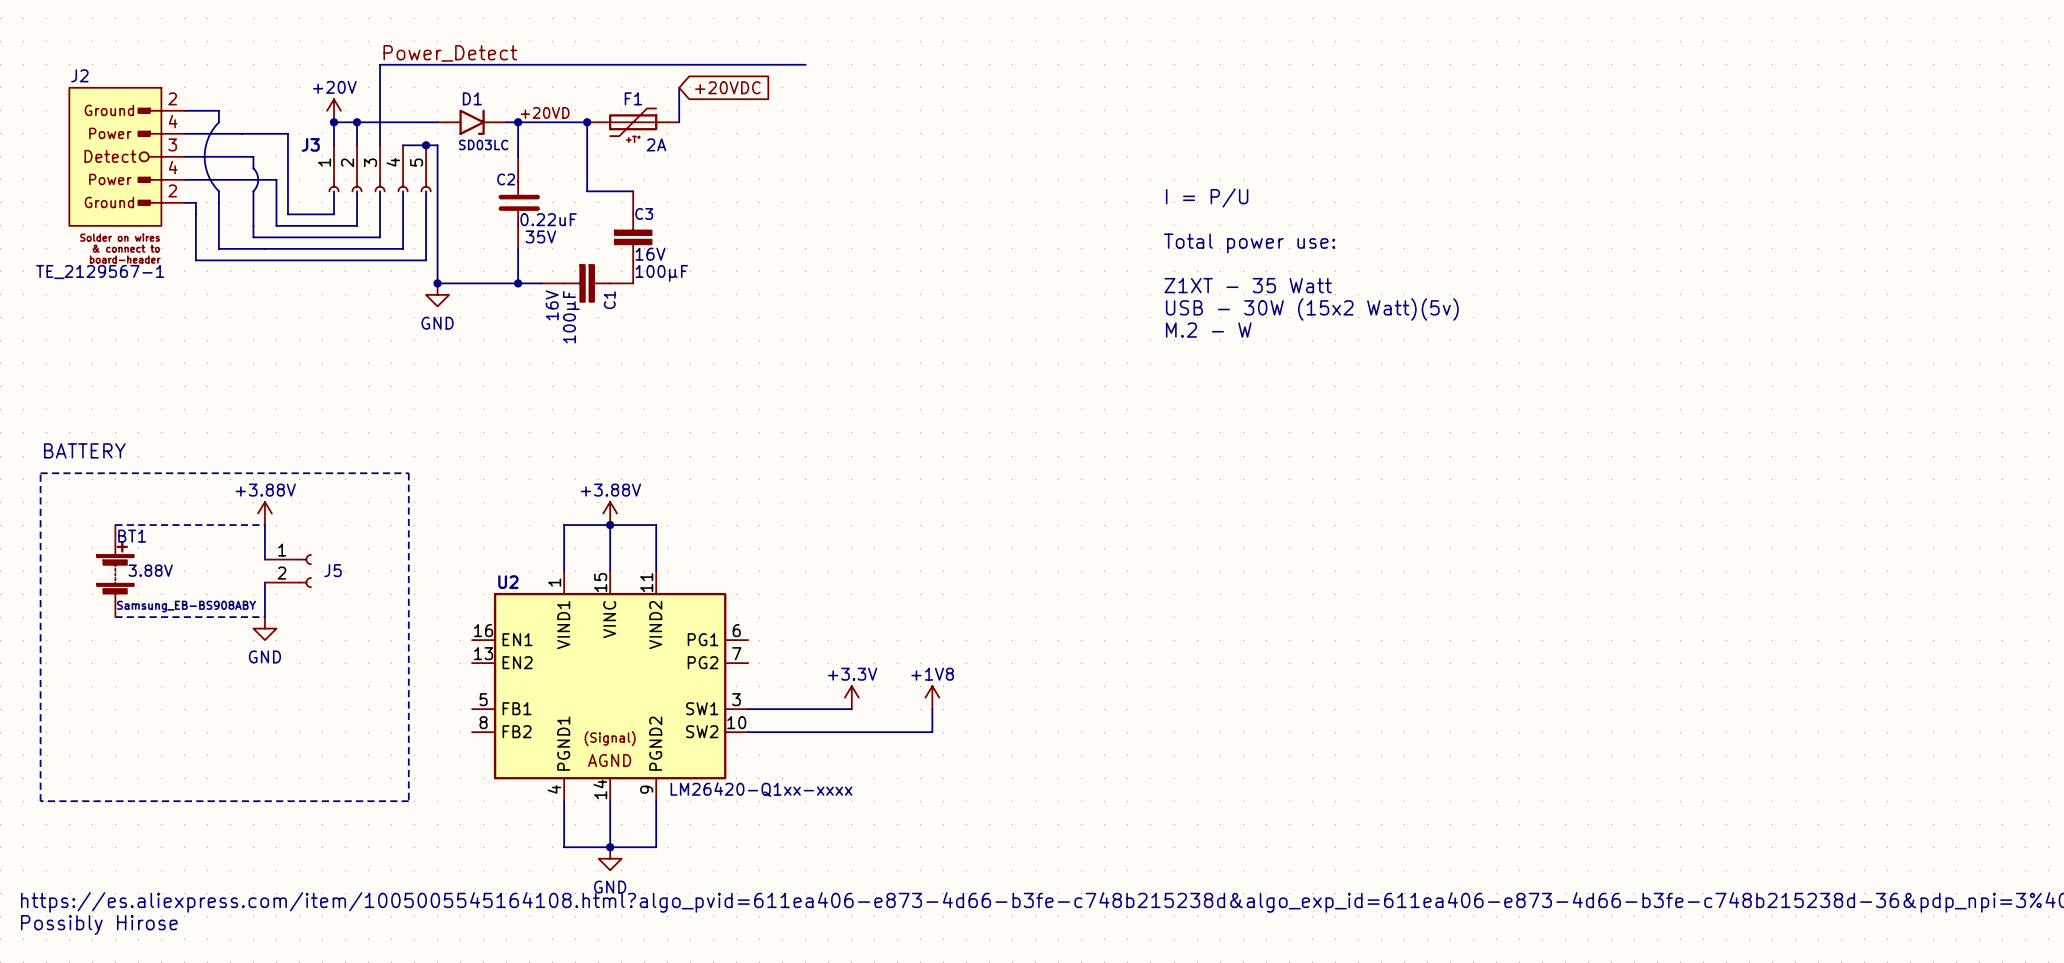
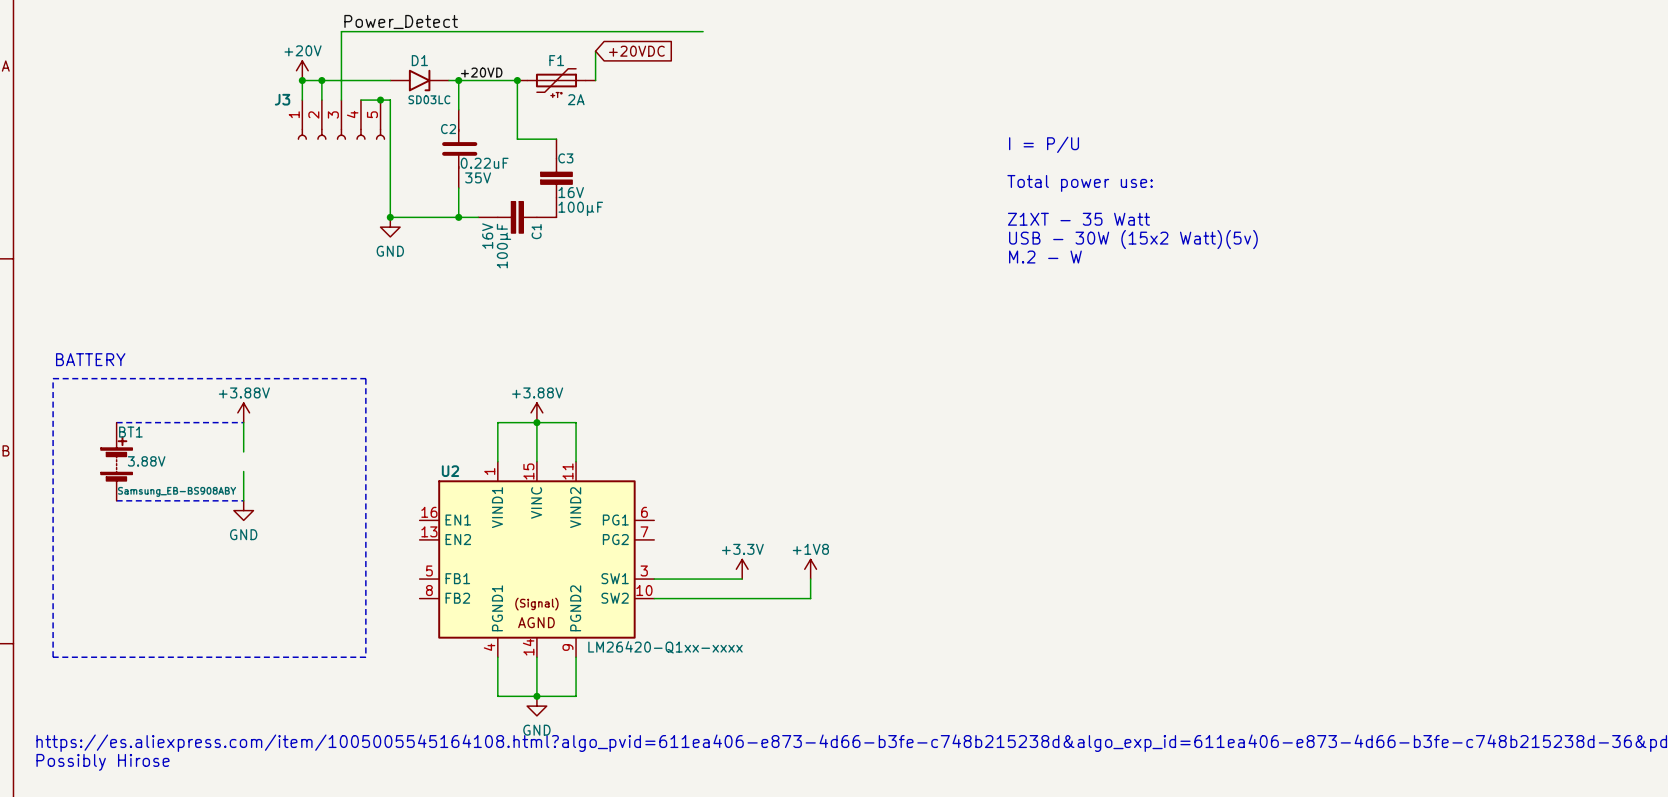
line: (184, 110) (218, 110) (218, 122) (207, 140) (204, 156) (209, 178) (218, 191) (218, 248) (403, 248) (403, 191) -> none
line: (184, 133) (287, 133) (287, 214) (334, 214) (334, 191) -> none
J2: TE_2129567-1 (126, 156) -> none
line: (184, 156) (253, 156) (253, 168) (258, 179) (253, 191) (253, 237) (380, 237) (380, 191) -> none
line: (184, 179) (276, 179) (276, 225) (357, 225) (357, 191) -> none
line: (426, 191) (426, 260) (195, 260) (195, 202) (184, 202) -> none
J5: (288, 571) -> none

